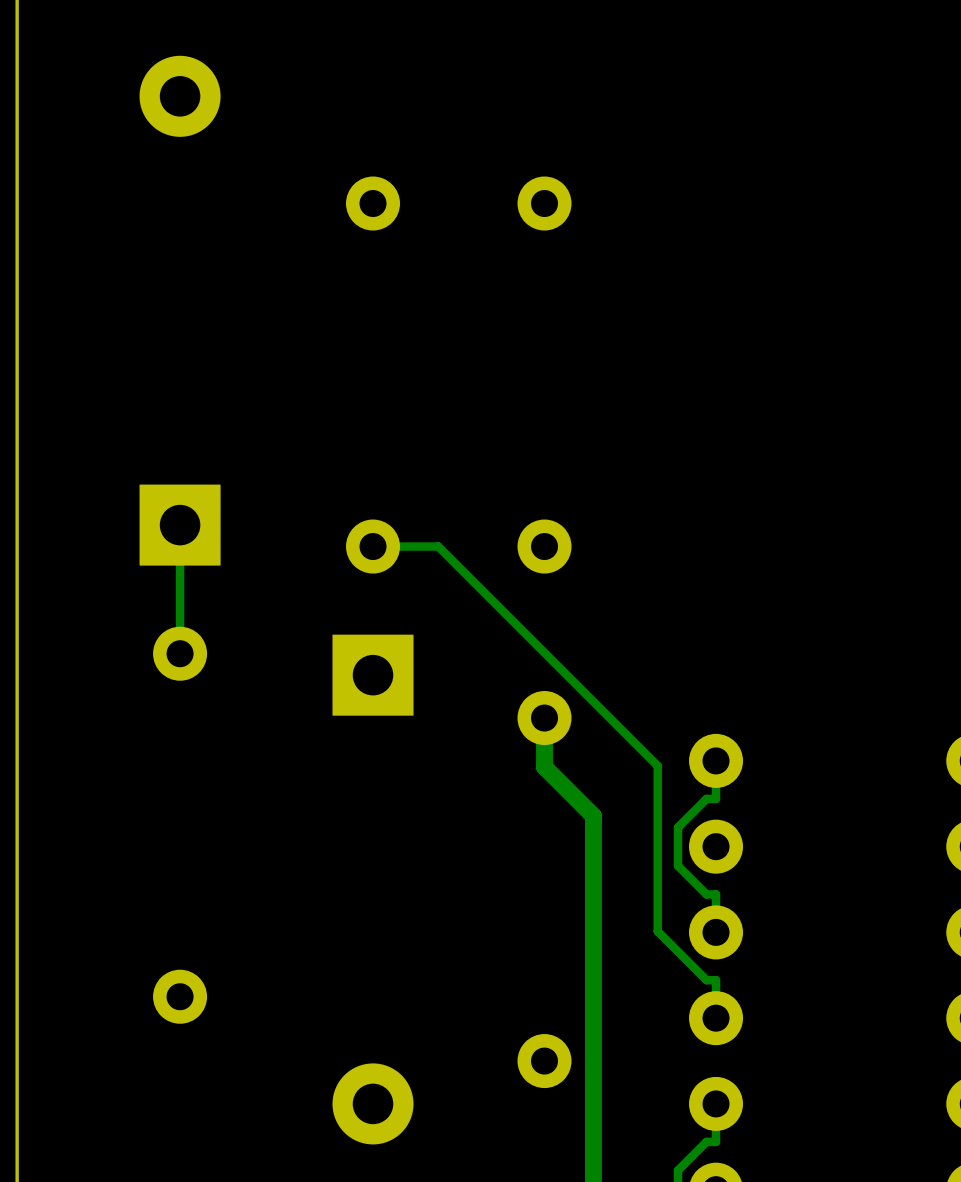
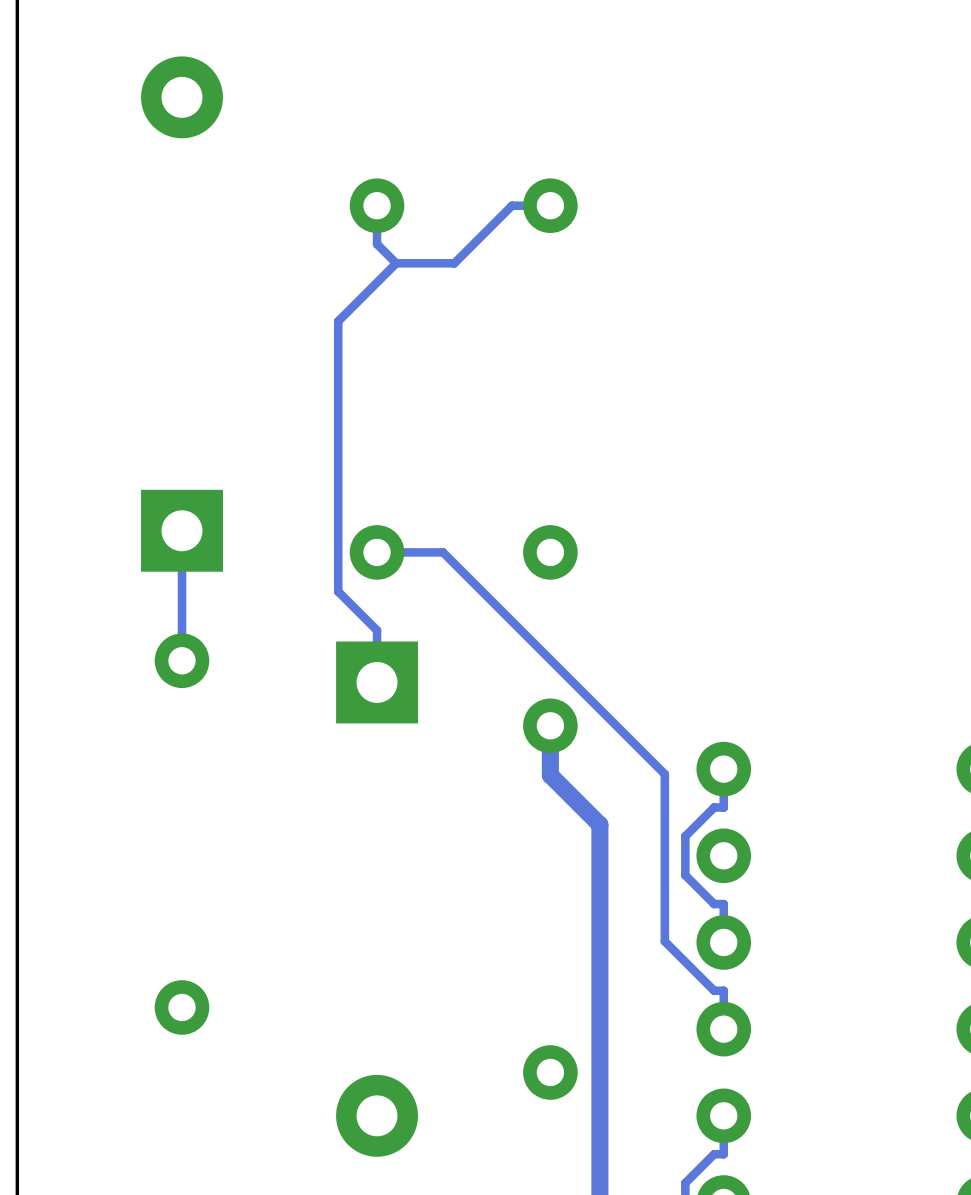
track: none -> (377, 205) (377, 244) (396, 263)
track: none -> (550, 205) (511, 205) (454, 263) (396, 263)
track: none -> (396, 263) (338, 321) (338, 591) (377, 630) (377, 682)

